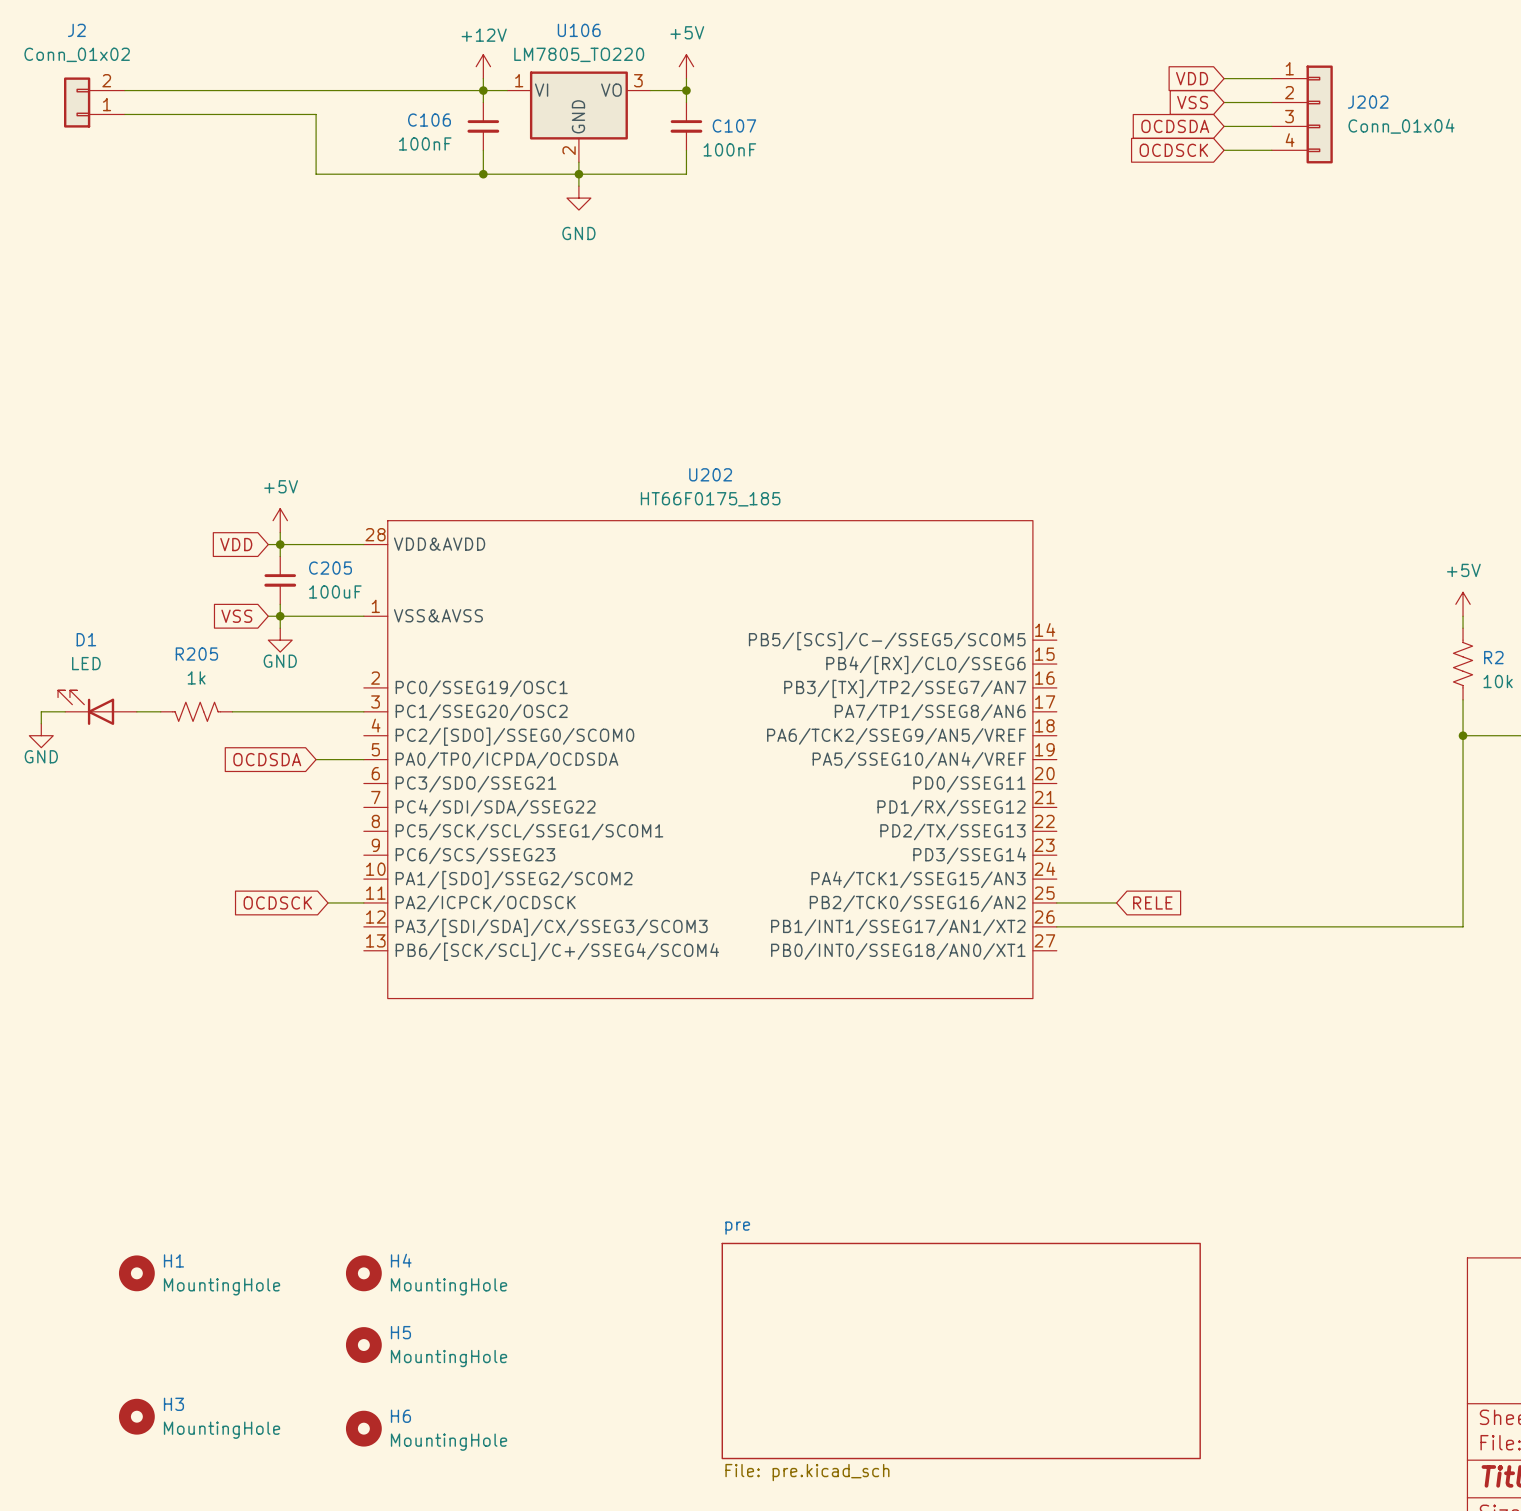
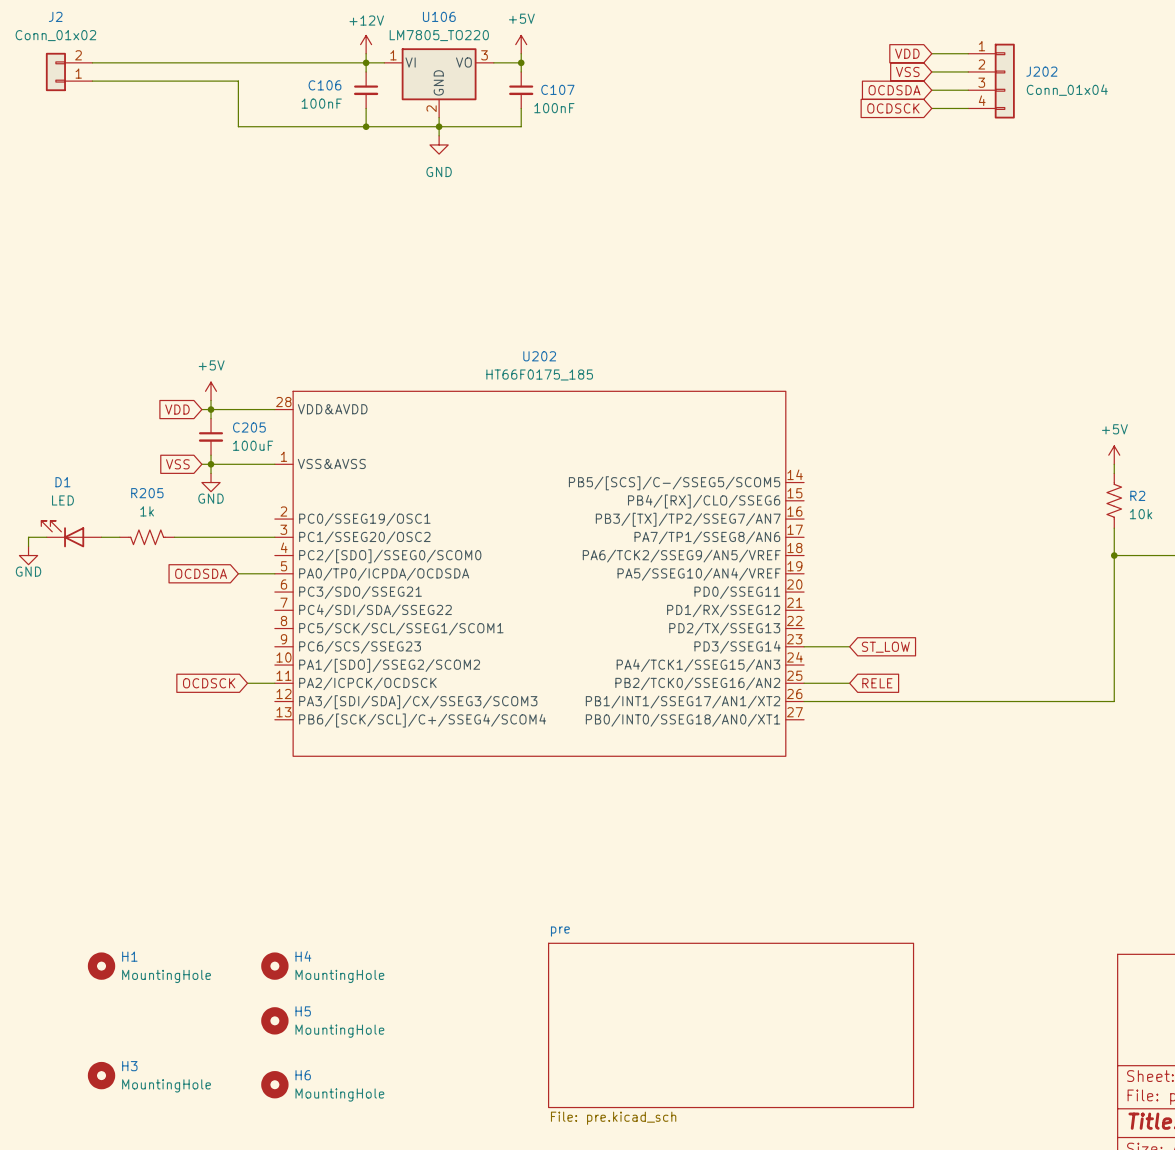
wire: none -> (804, 646) (849, 646)
global label: none -> ST_LOW (885, 647)

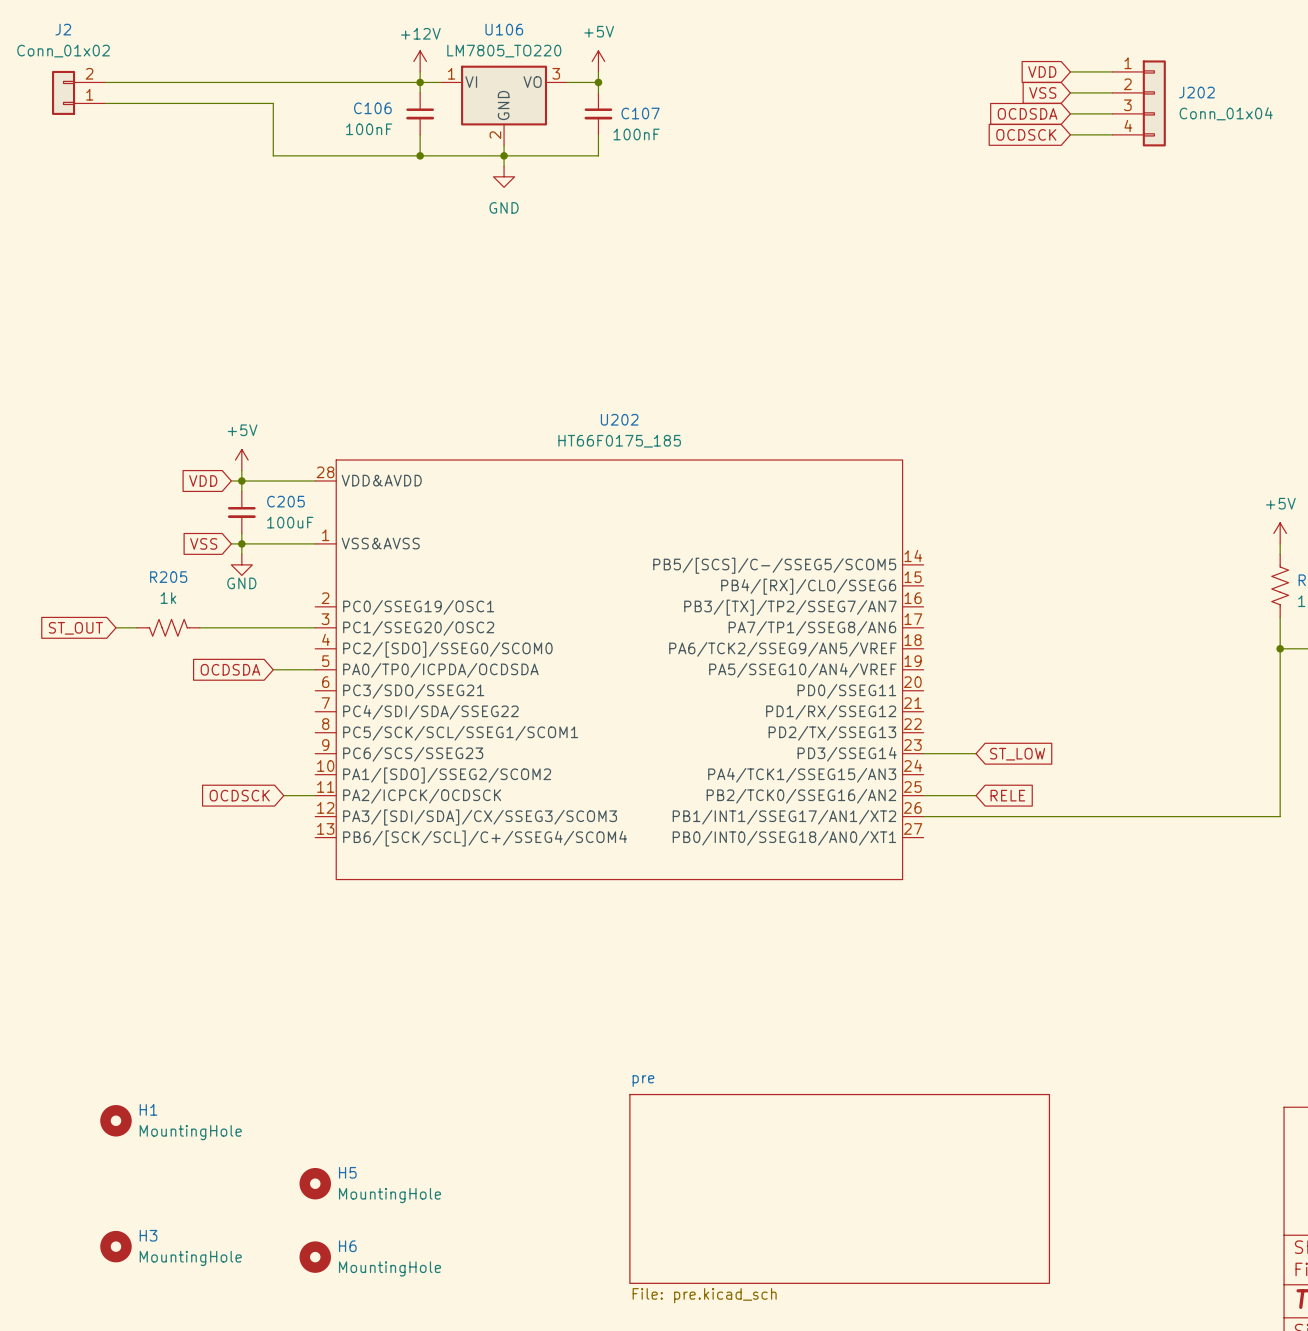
D1: LED (71, 534) -> none
wire: (46, 537) (28, 537) (28, 546) -> none
global label: none -> ST_OUT (75, 628)
power symbol: GND (28, 555) -> none
H4: MountingHole (274, 966) -> none

